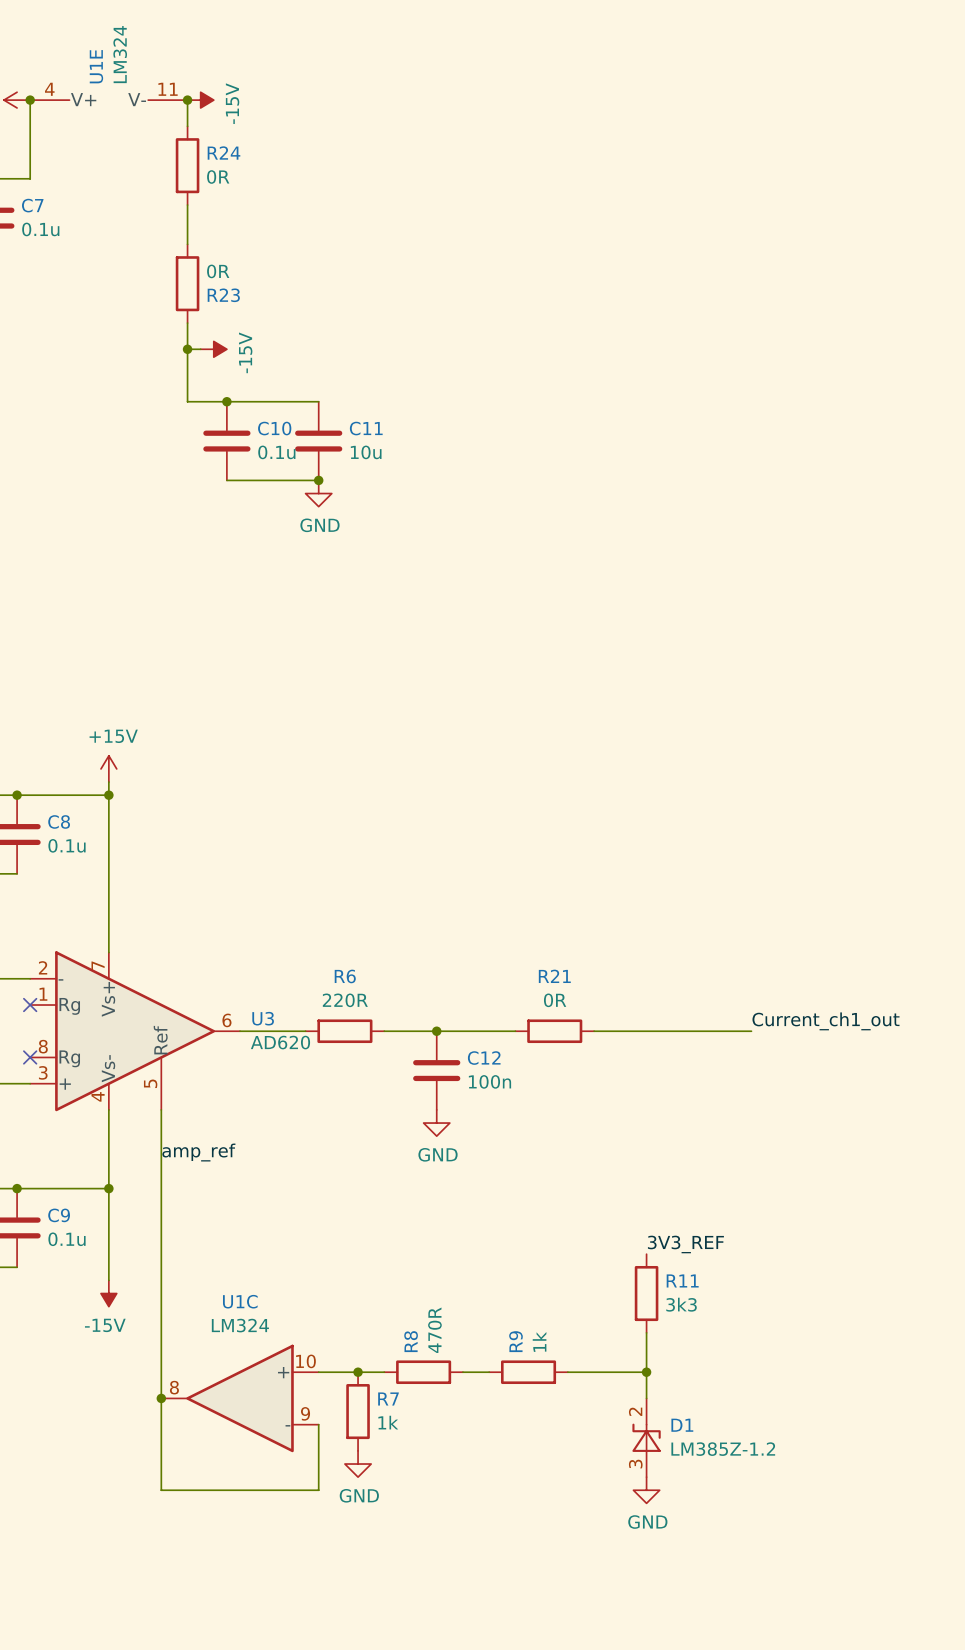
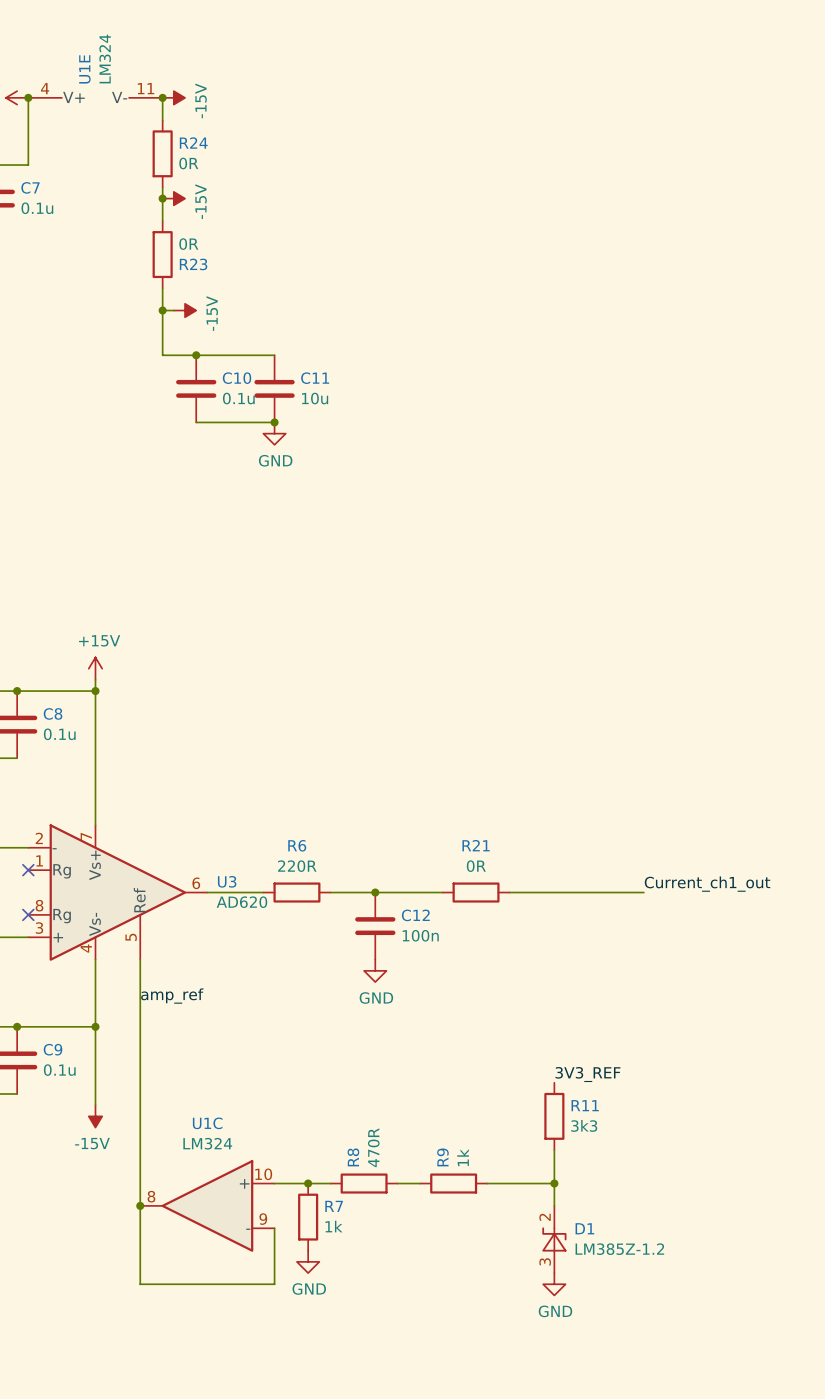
junction: none -> (162, 198)
power symbol: none -> -15V (173, 198)

